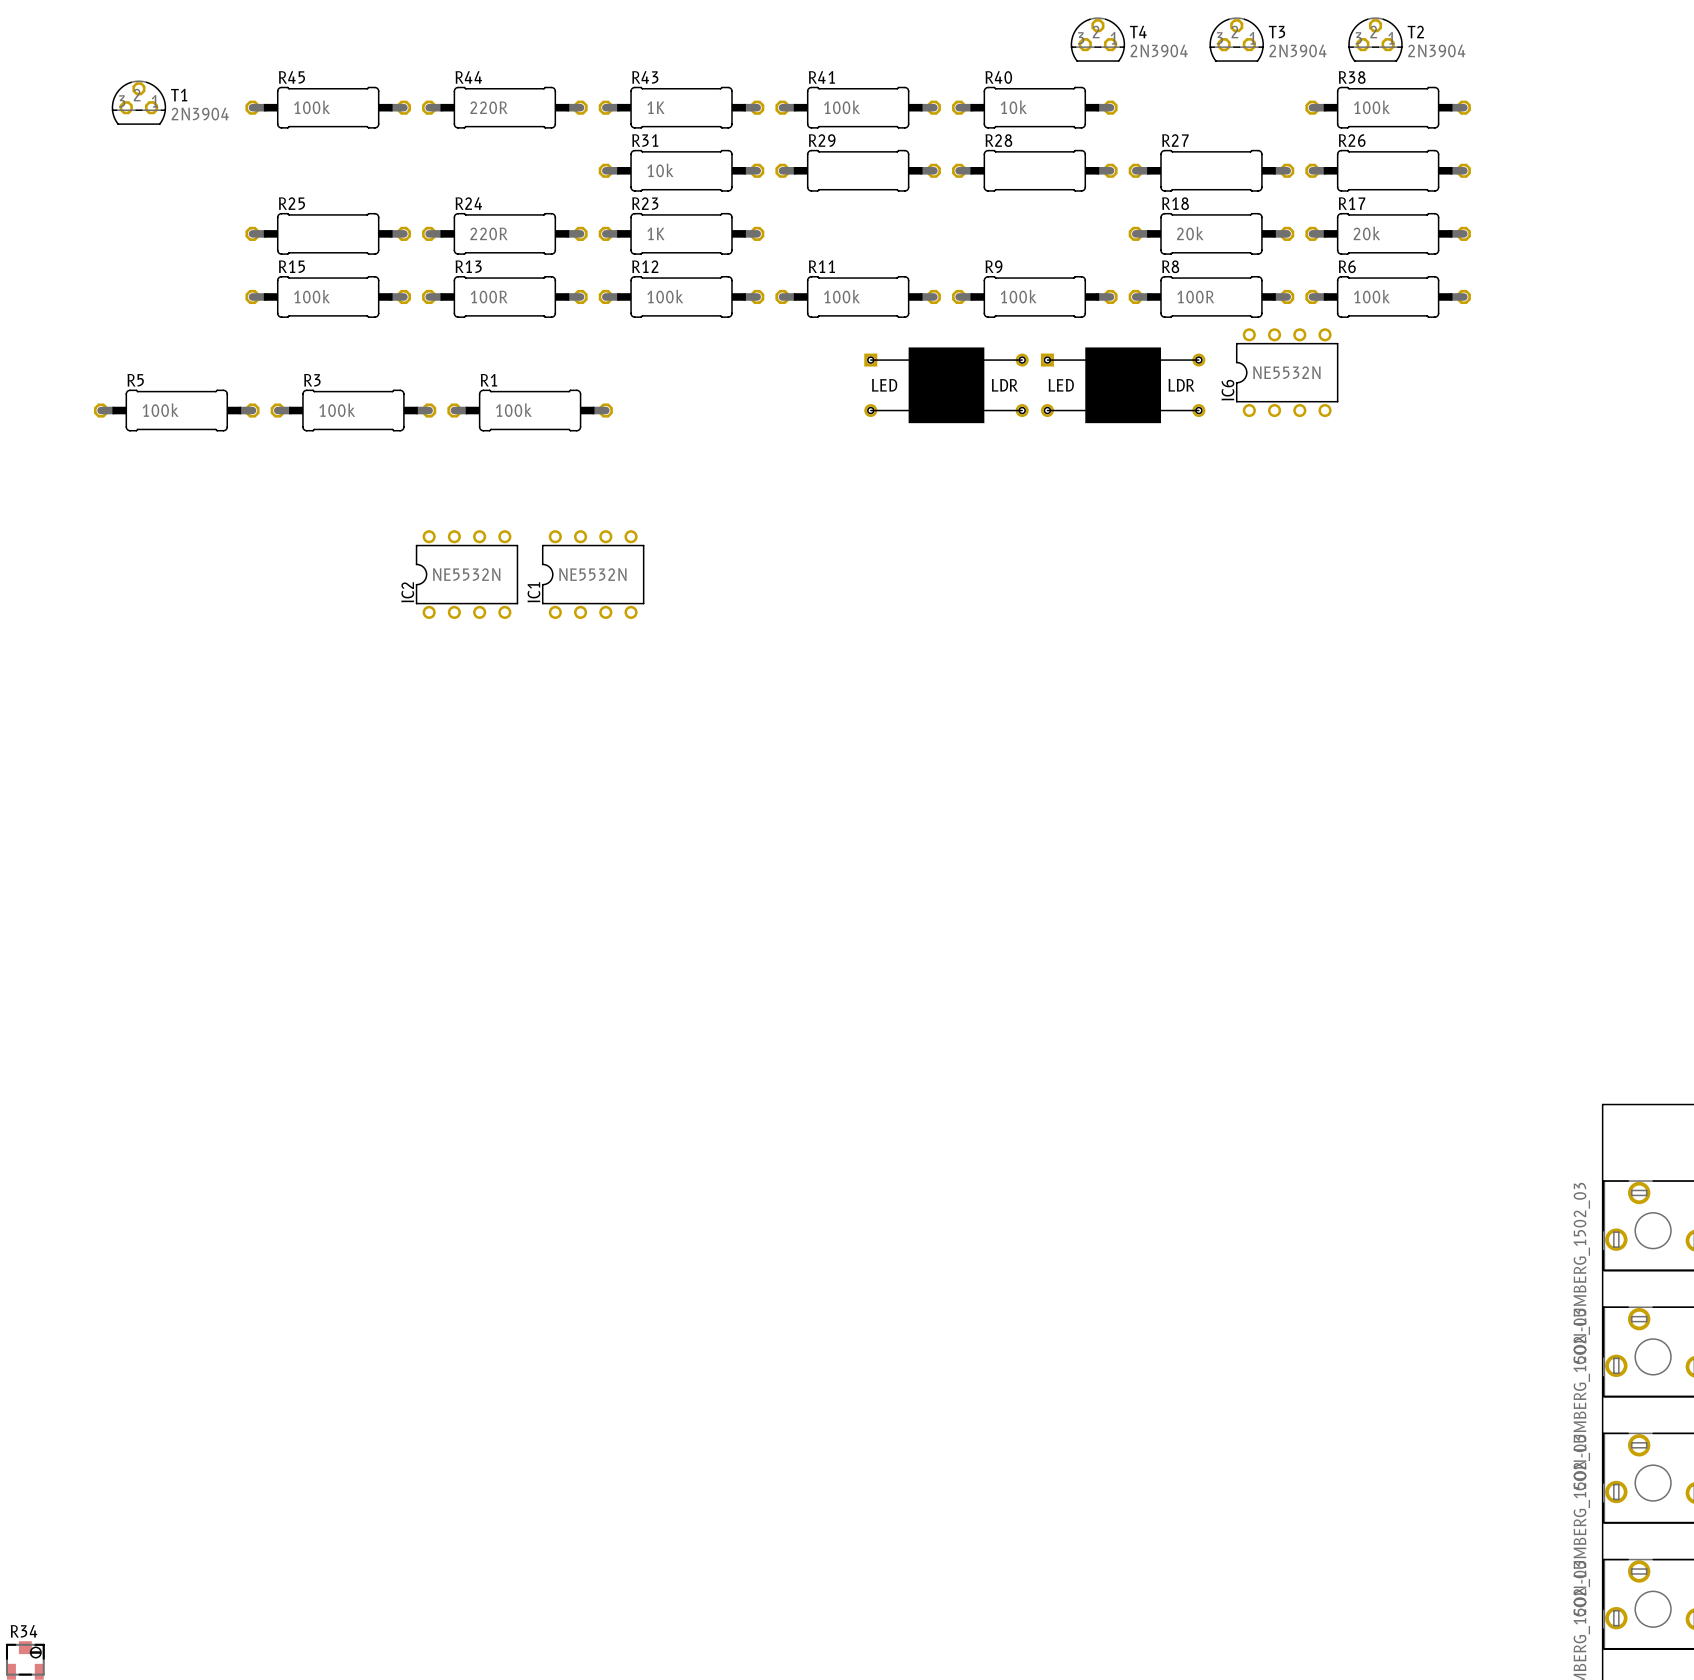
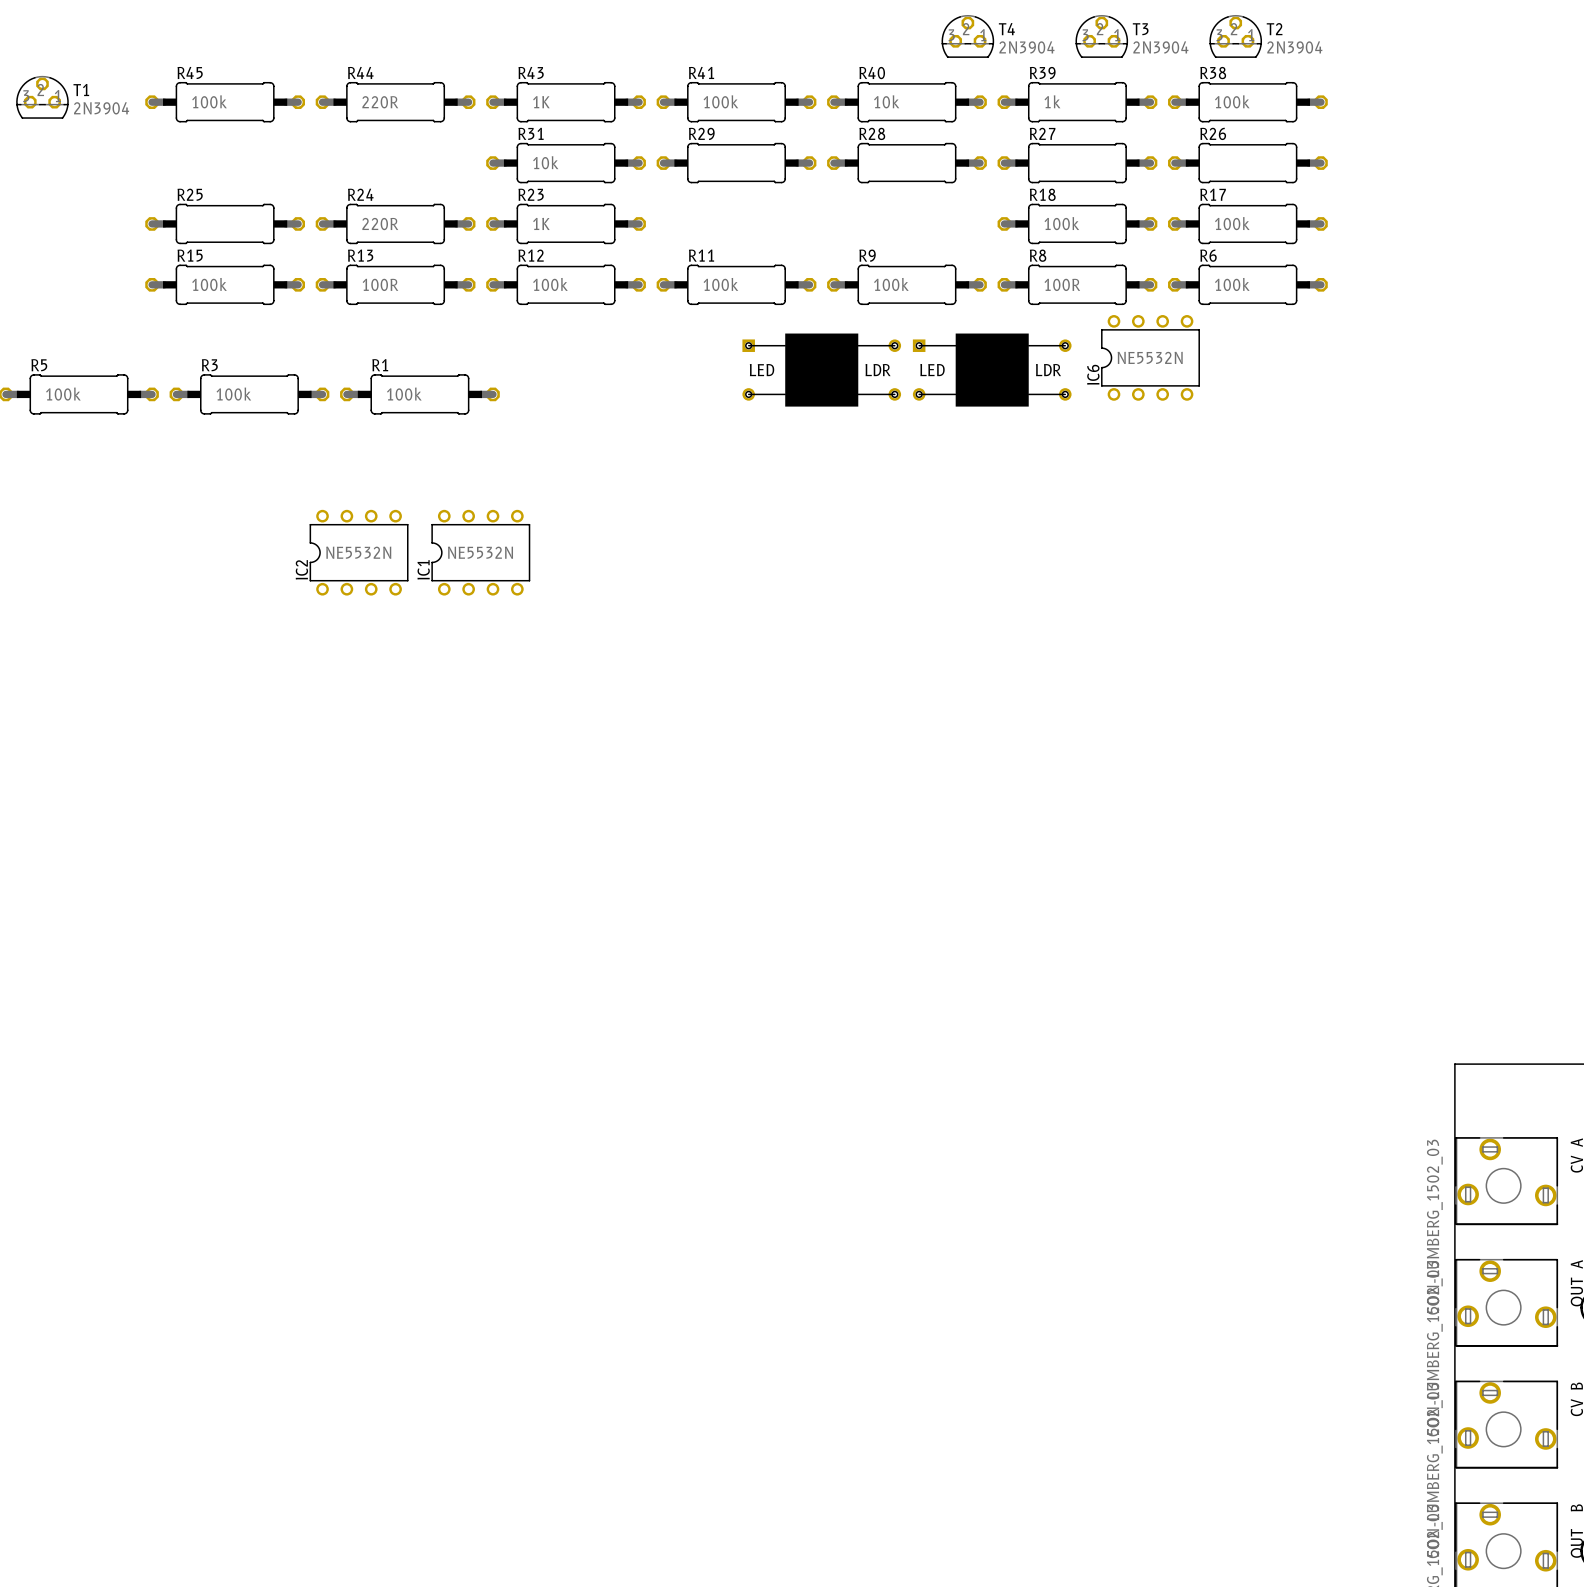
R39: none -> 1k (1077, 102)
R18 value: 20k (1190, 233) -> 100k (1061, 223)
R17 value: 20k (1366, 233) -> 100k (1232, 223)

